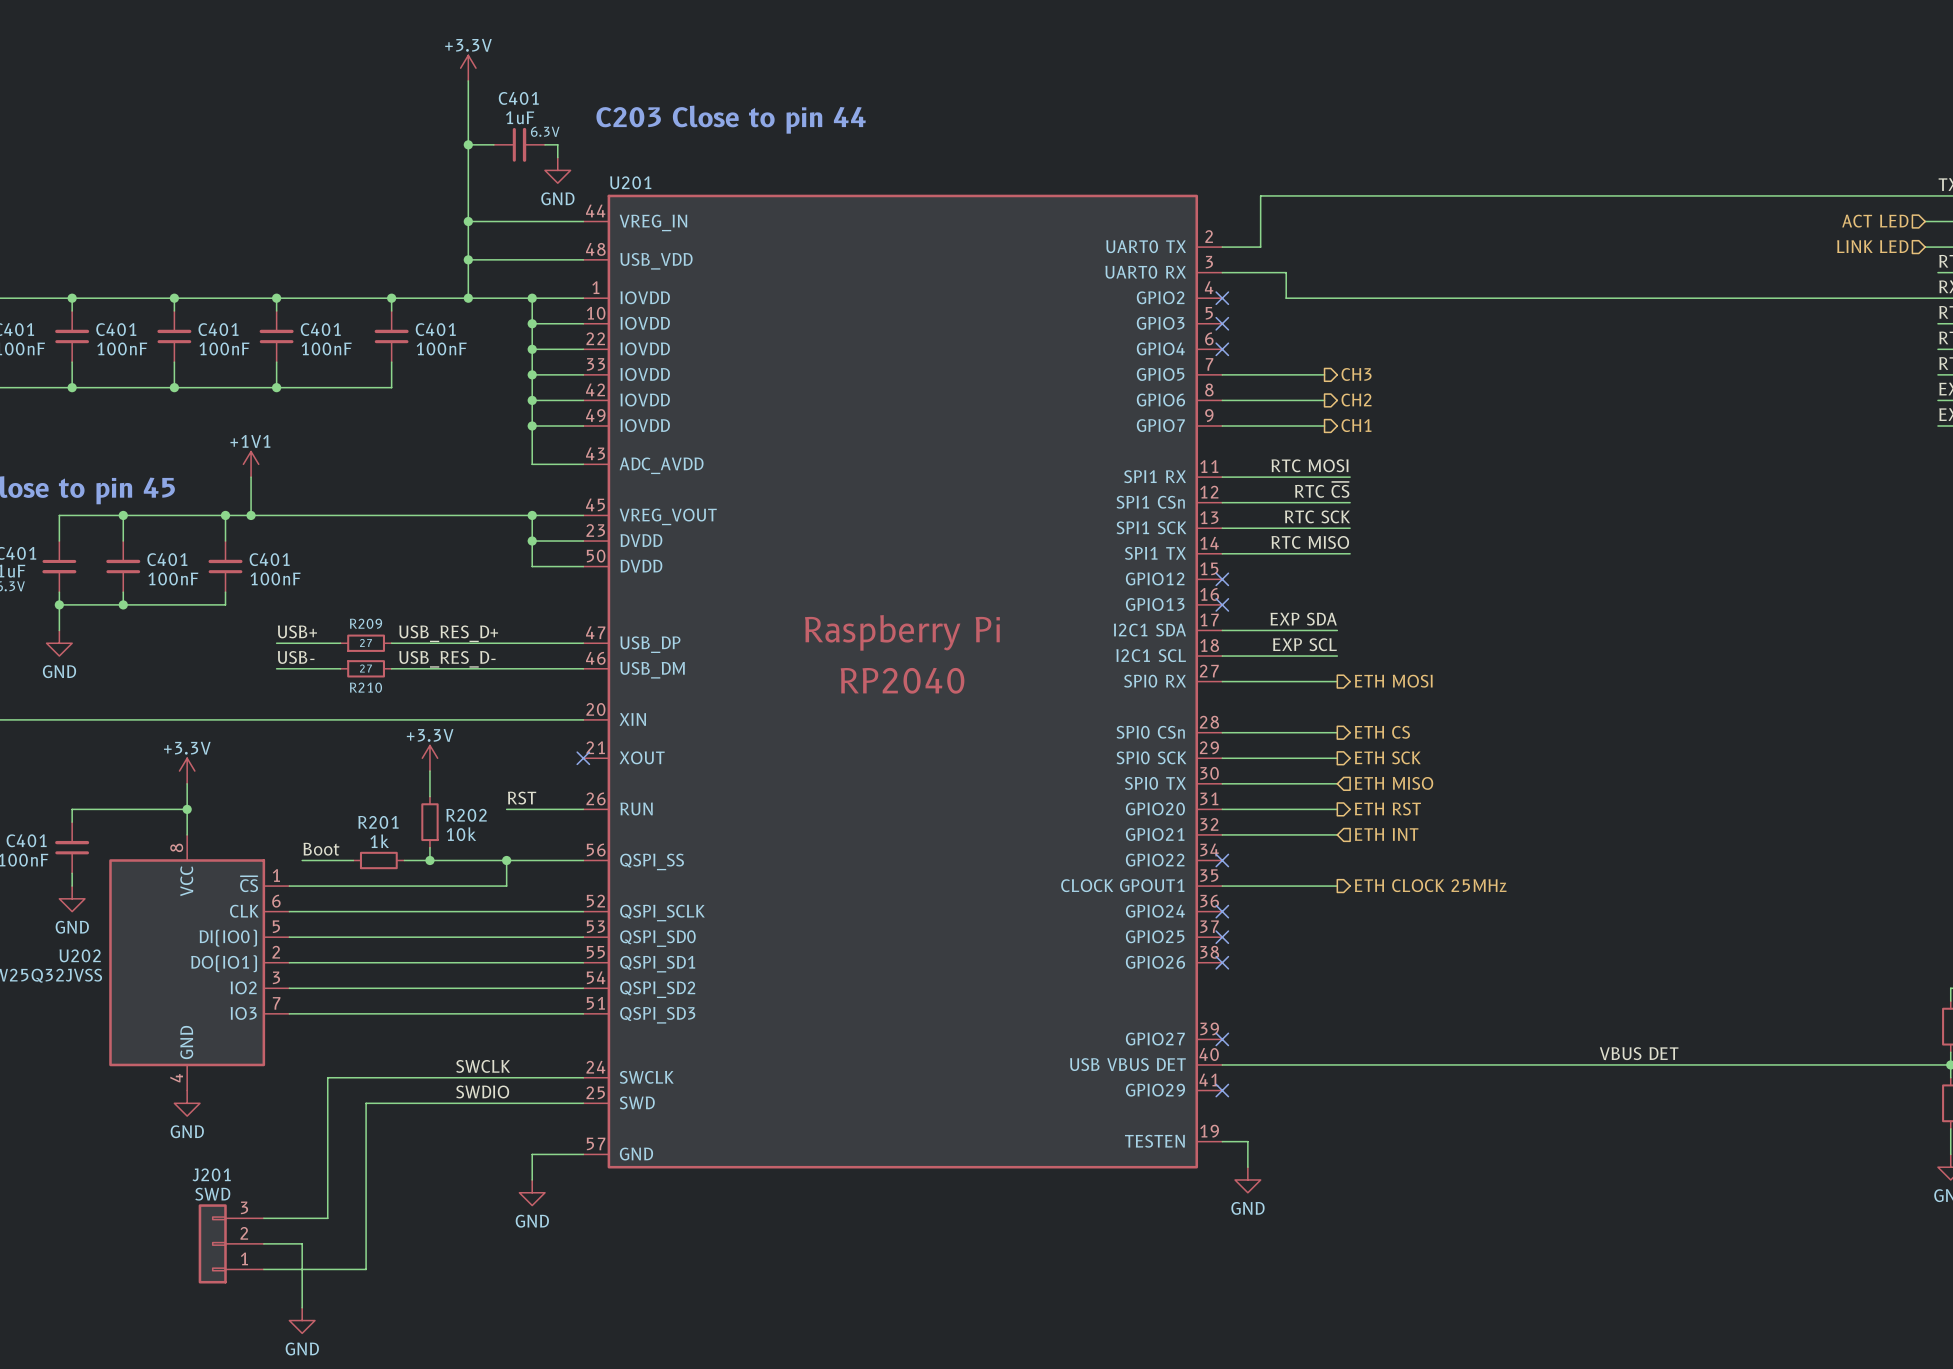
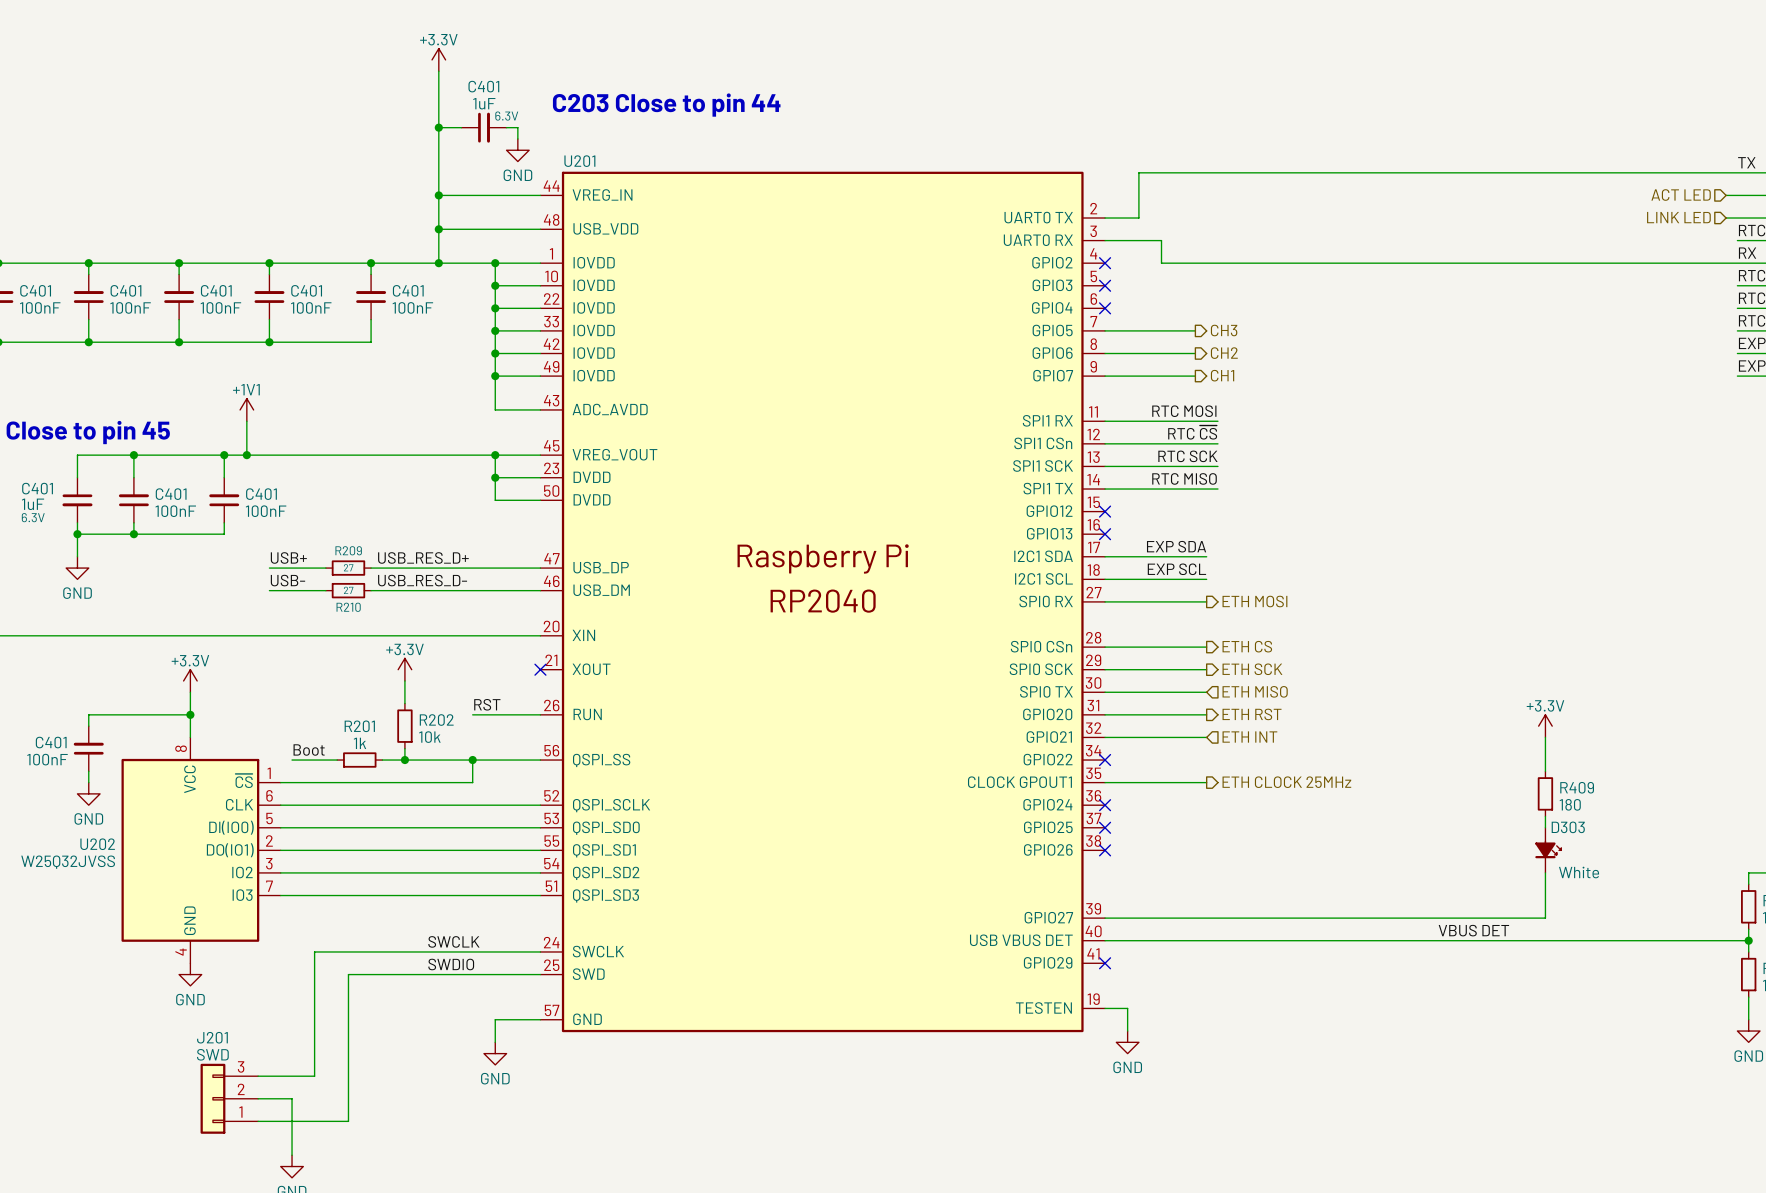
power symbol: none -> +3.3V (1545, 726)
wire: none -> (1545, 737) (1545, 771)
R409: none -> 180 (1545, 793)
wire: none -> (1545, 816) (1545, 827)
D303: none -> White (1548, 850)
wire: none -> (1545, 872) (1545, 918) (1105, 918)
no-connect mark: (1222, 1039) -> none

